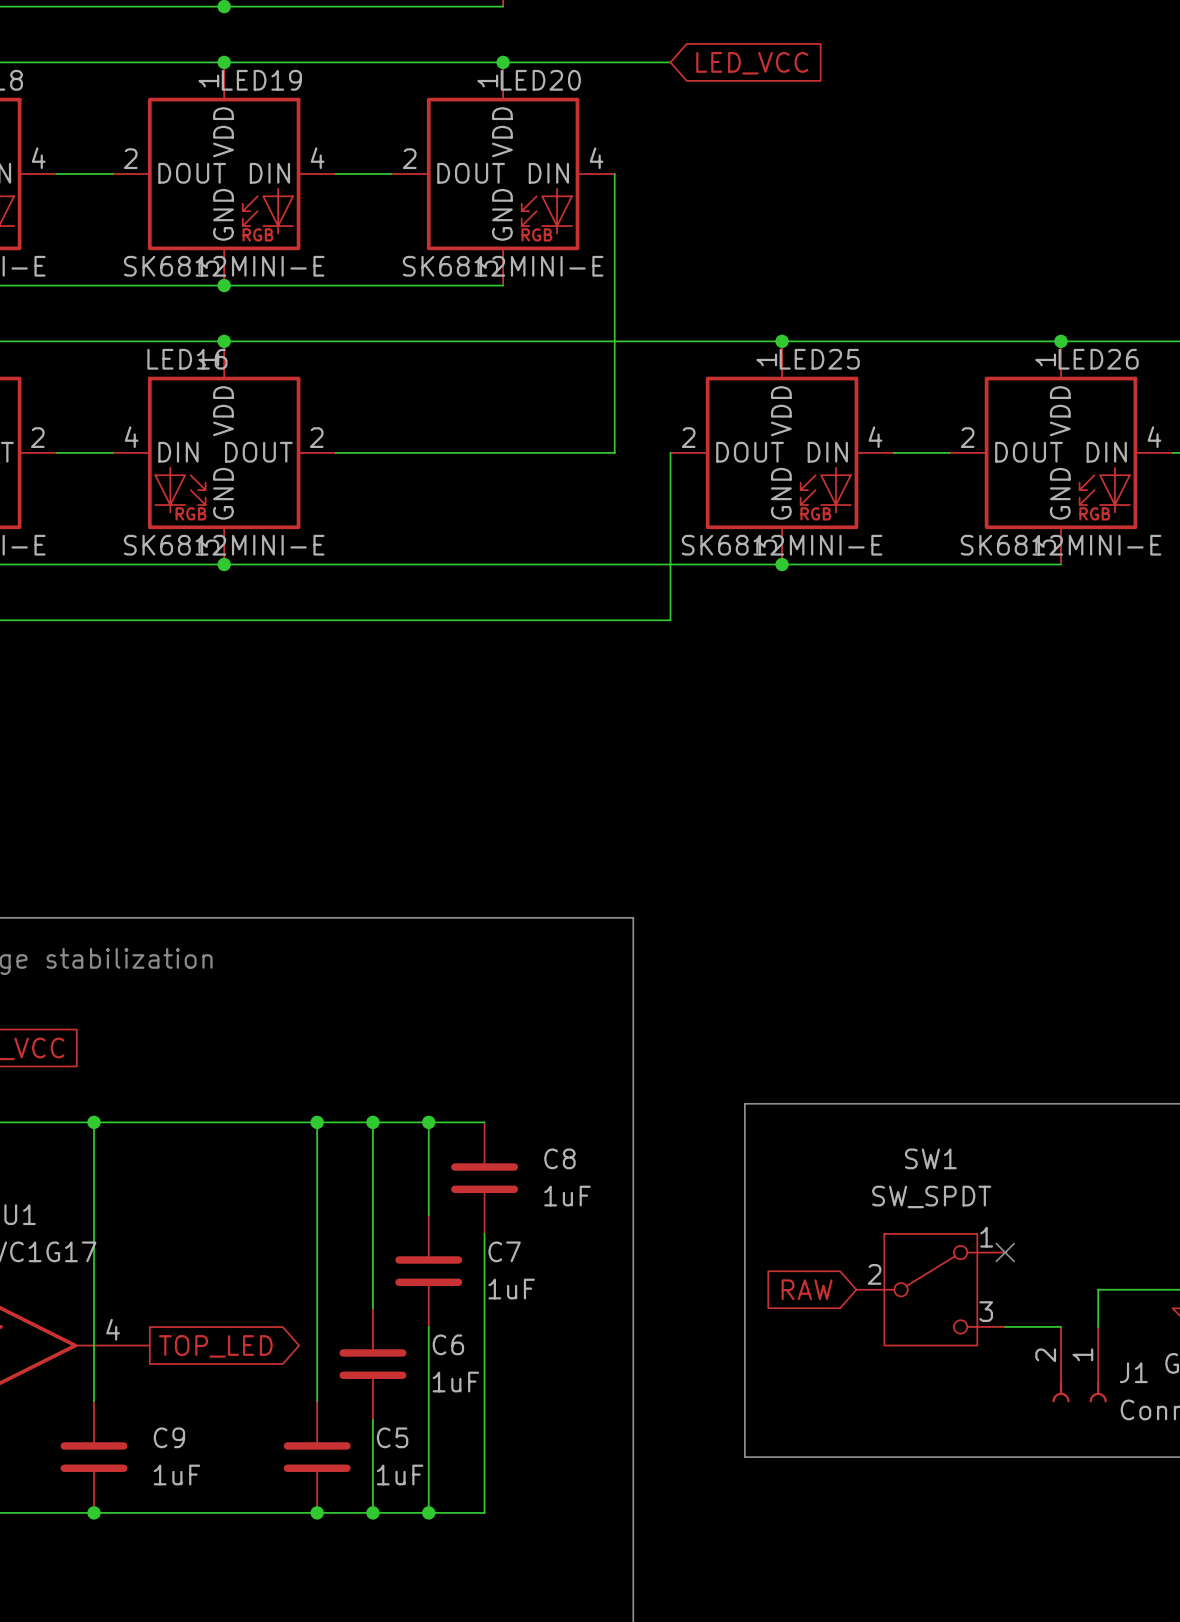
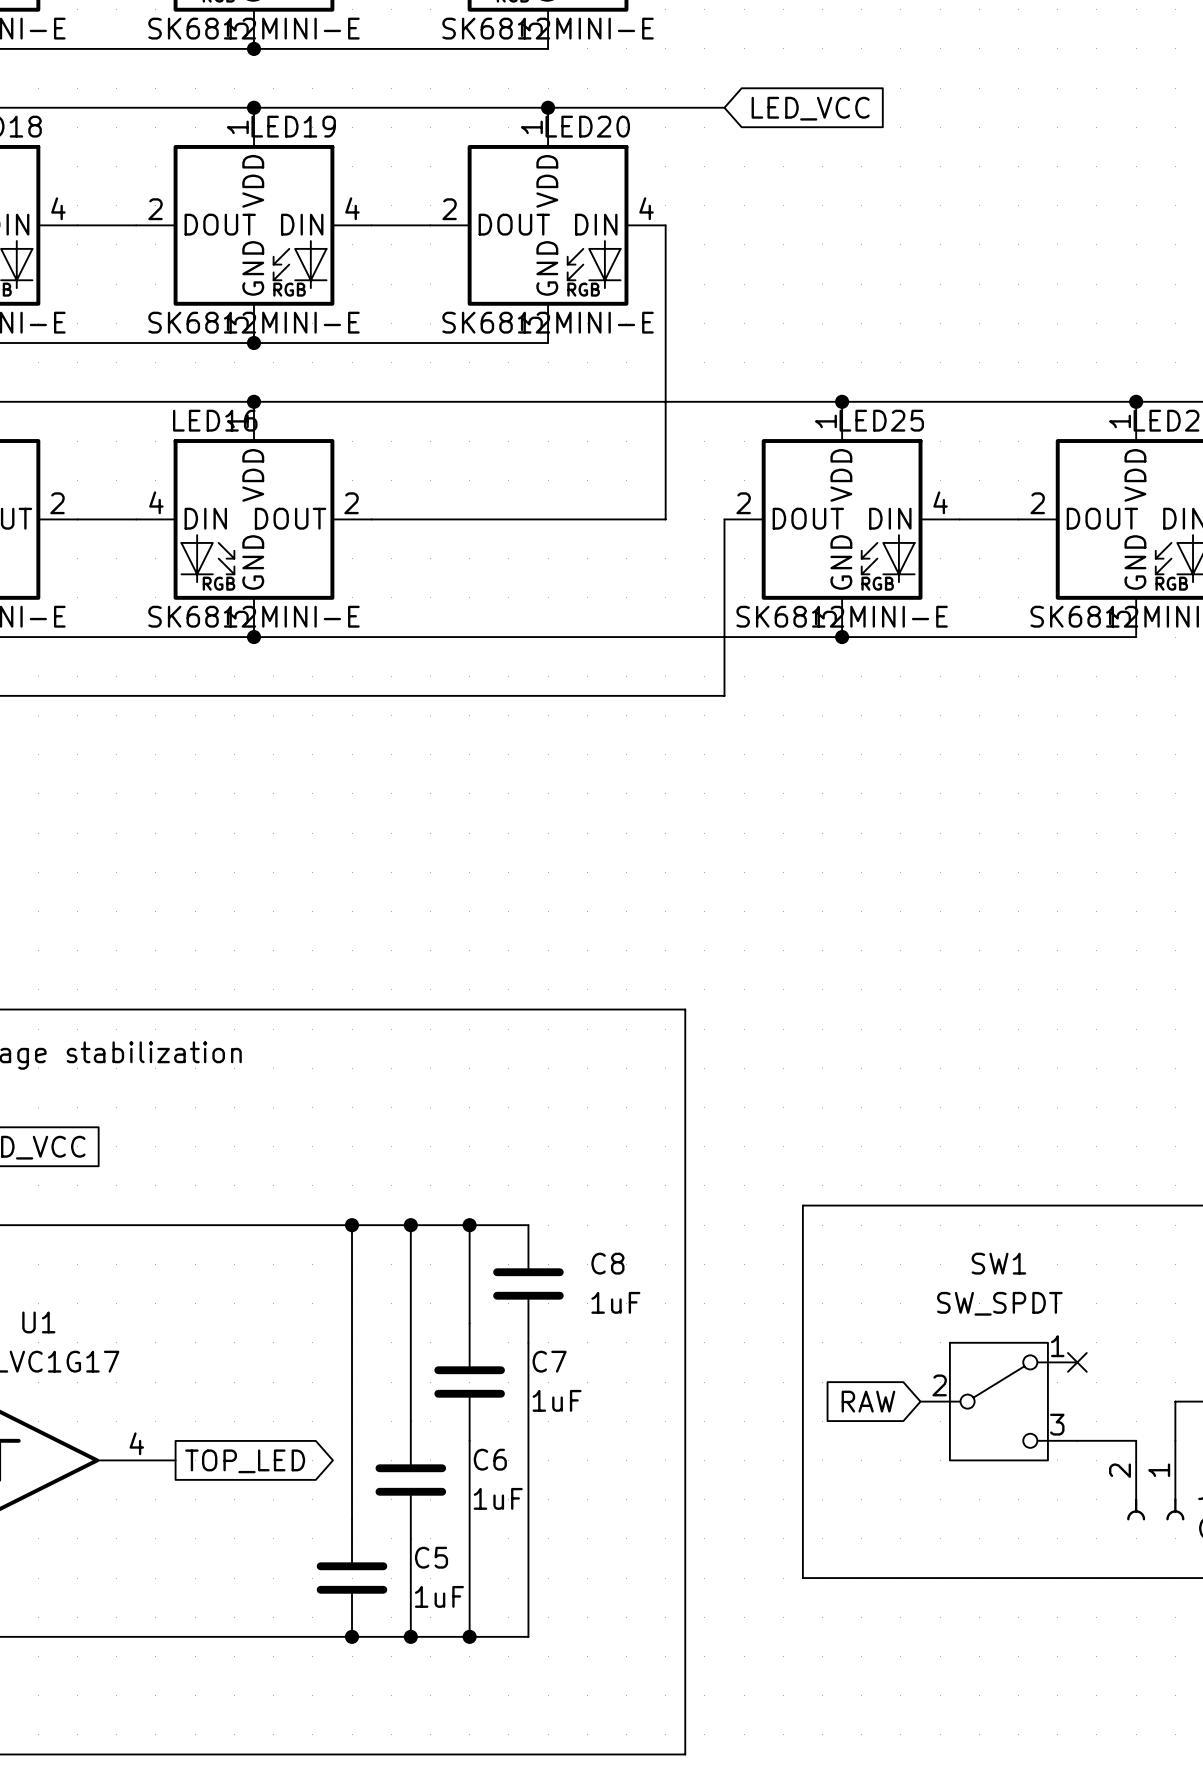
wire: (94, 1122) (94, 1401) -> none
junction: (94, 1122) -> none
C9: 1uF (94, 1457) -> none
junction: (94, 1512) -> none

